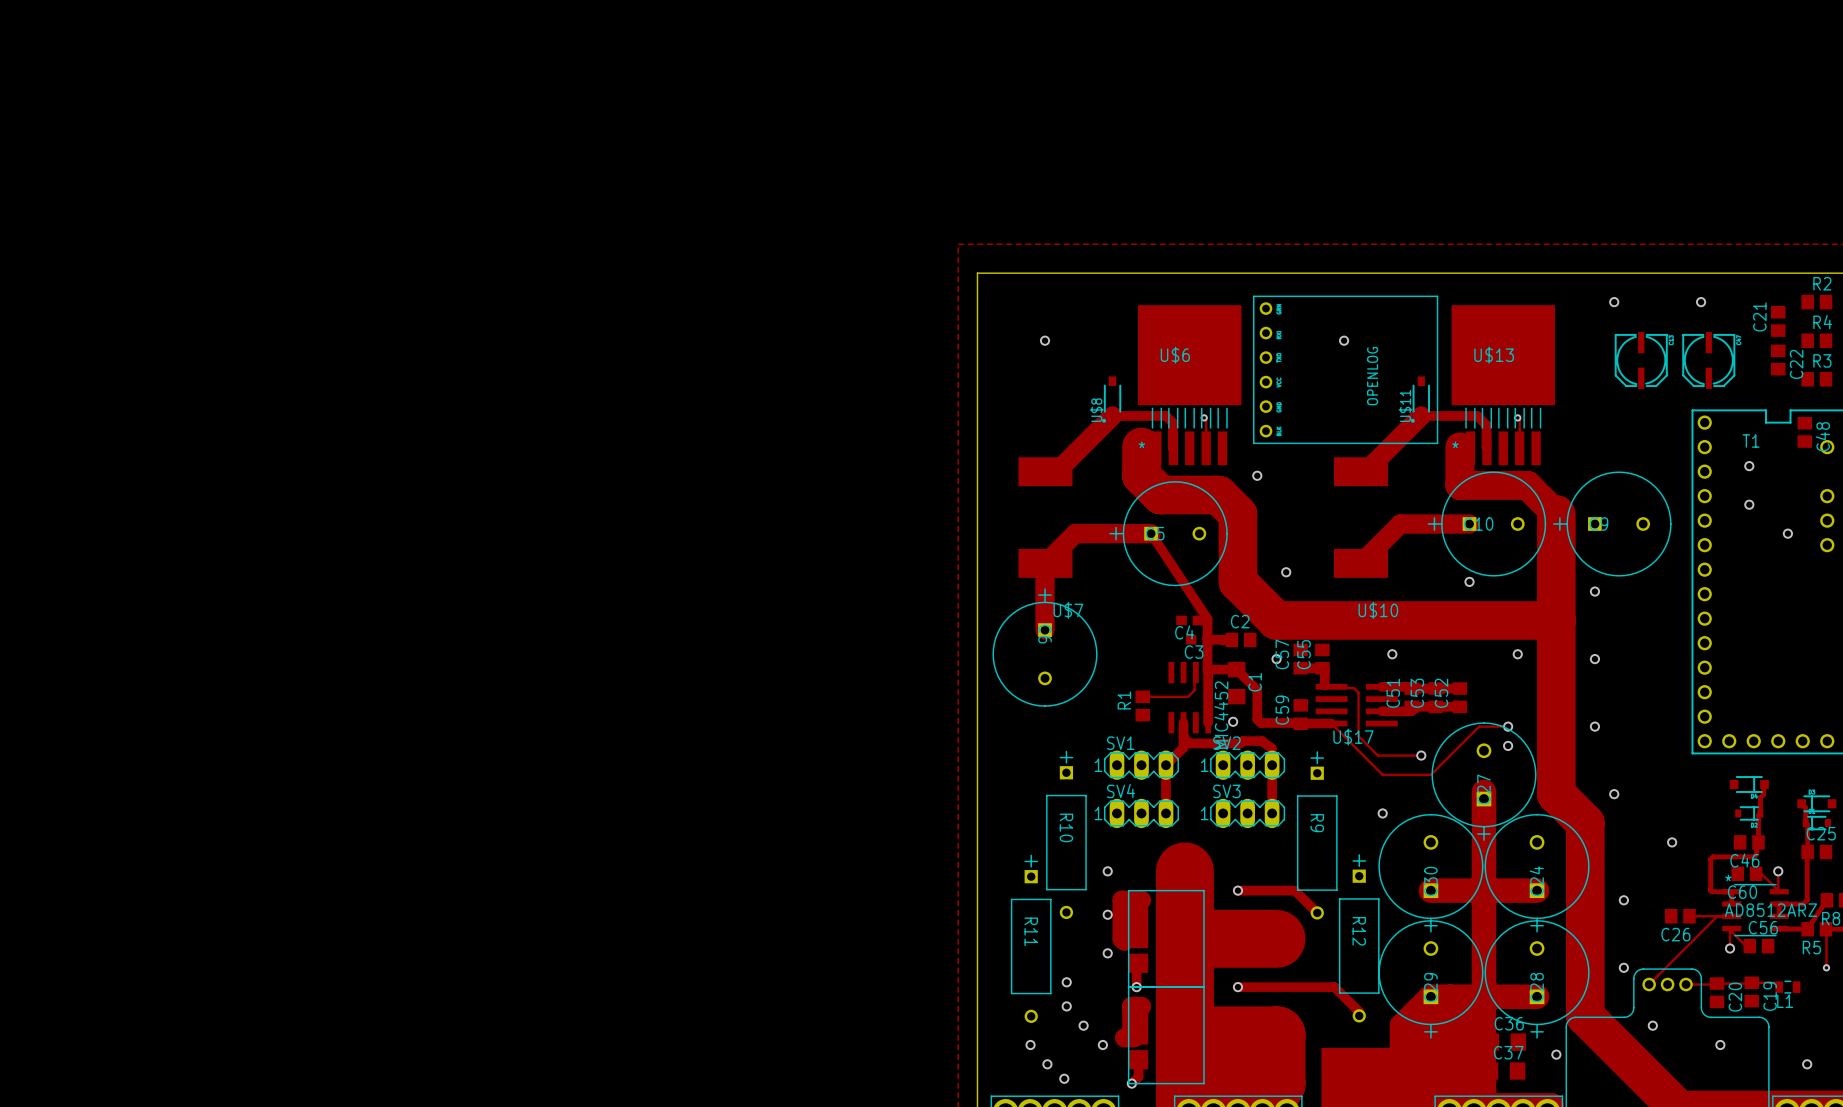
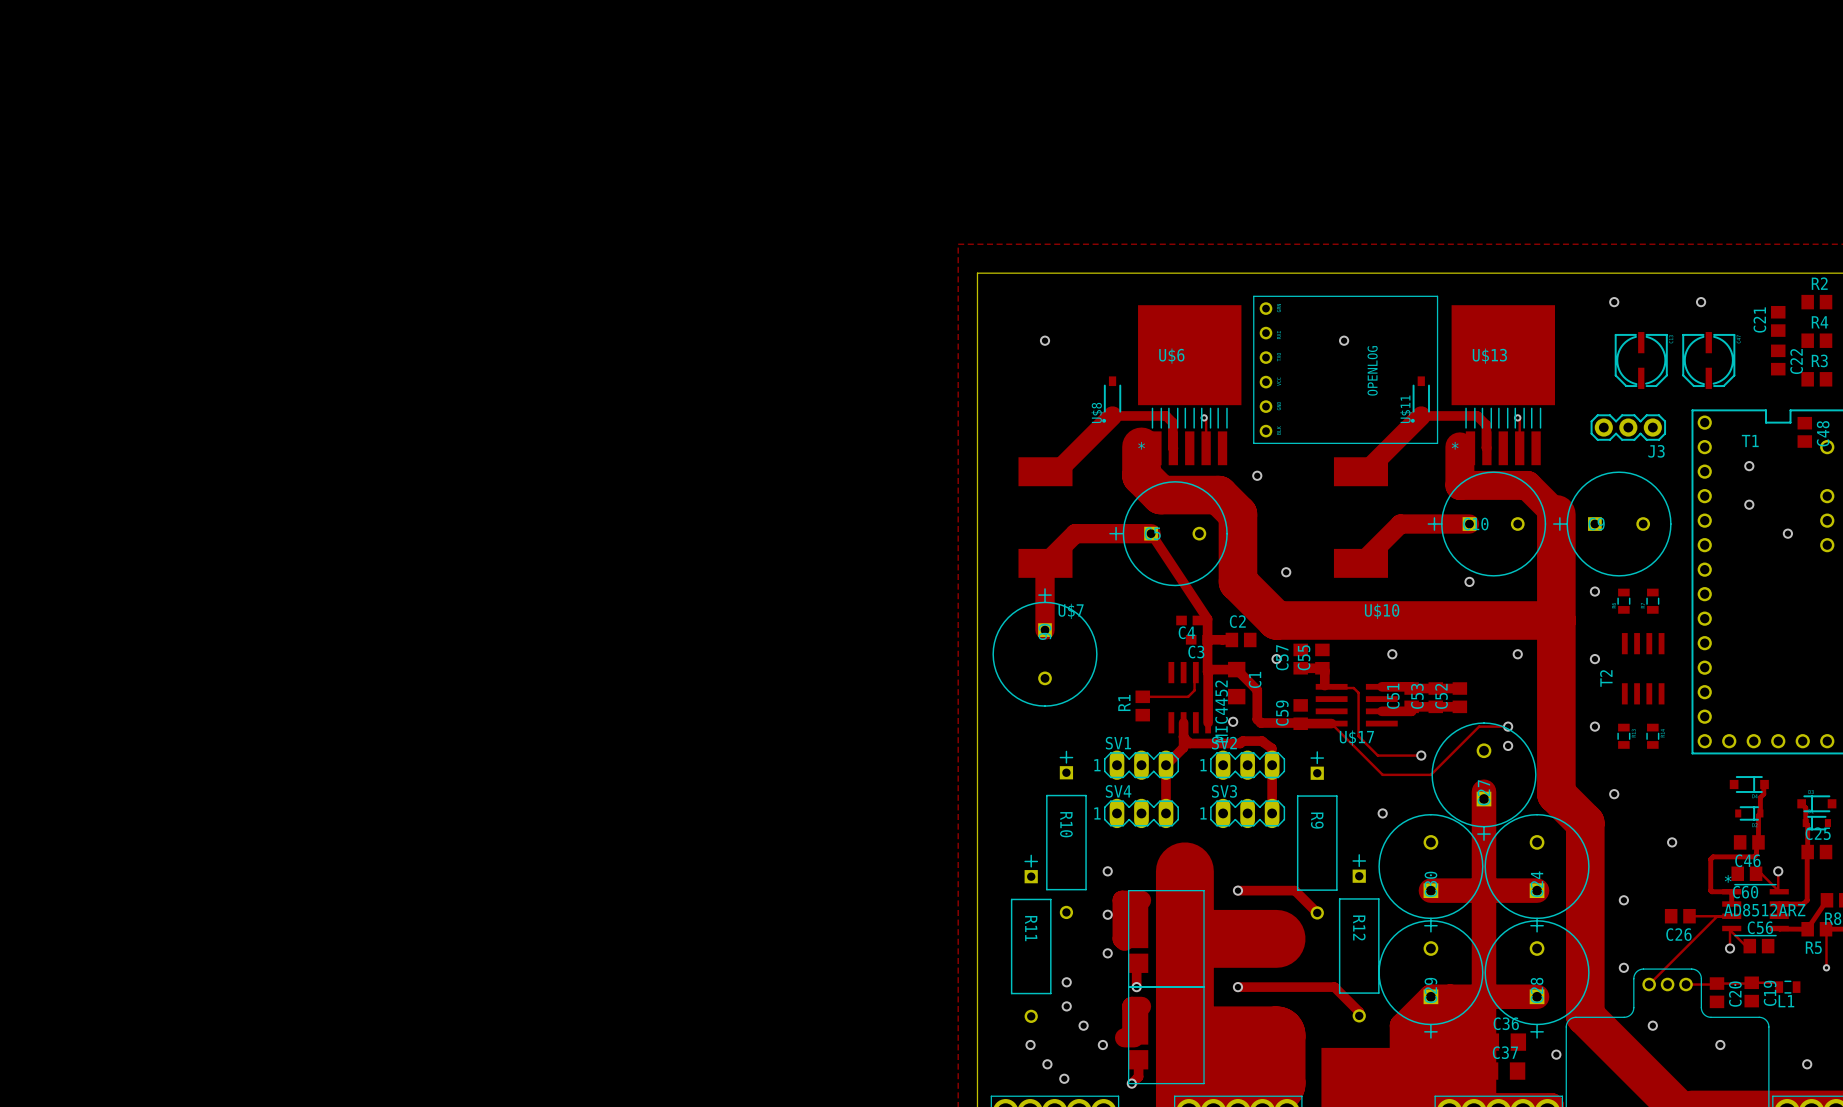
J3: none -> (1628, 427)
part: none -> (1623, 601)
part: none -> (1652, 601)
T2: none -> (1643, 668)
part: none -> (1623, 736)
part: none -> (1652, 736)

